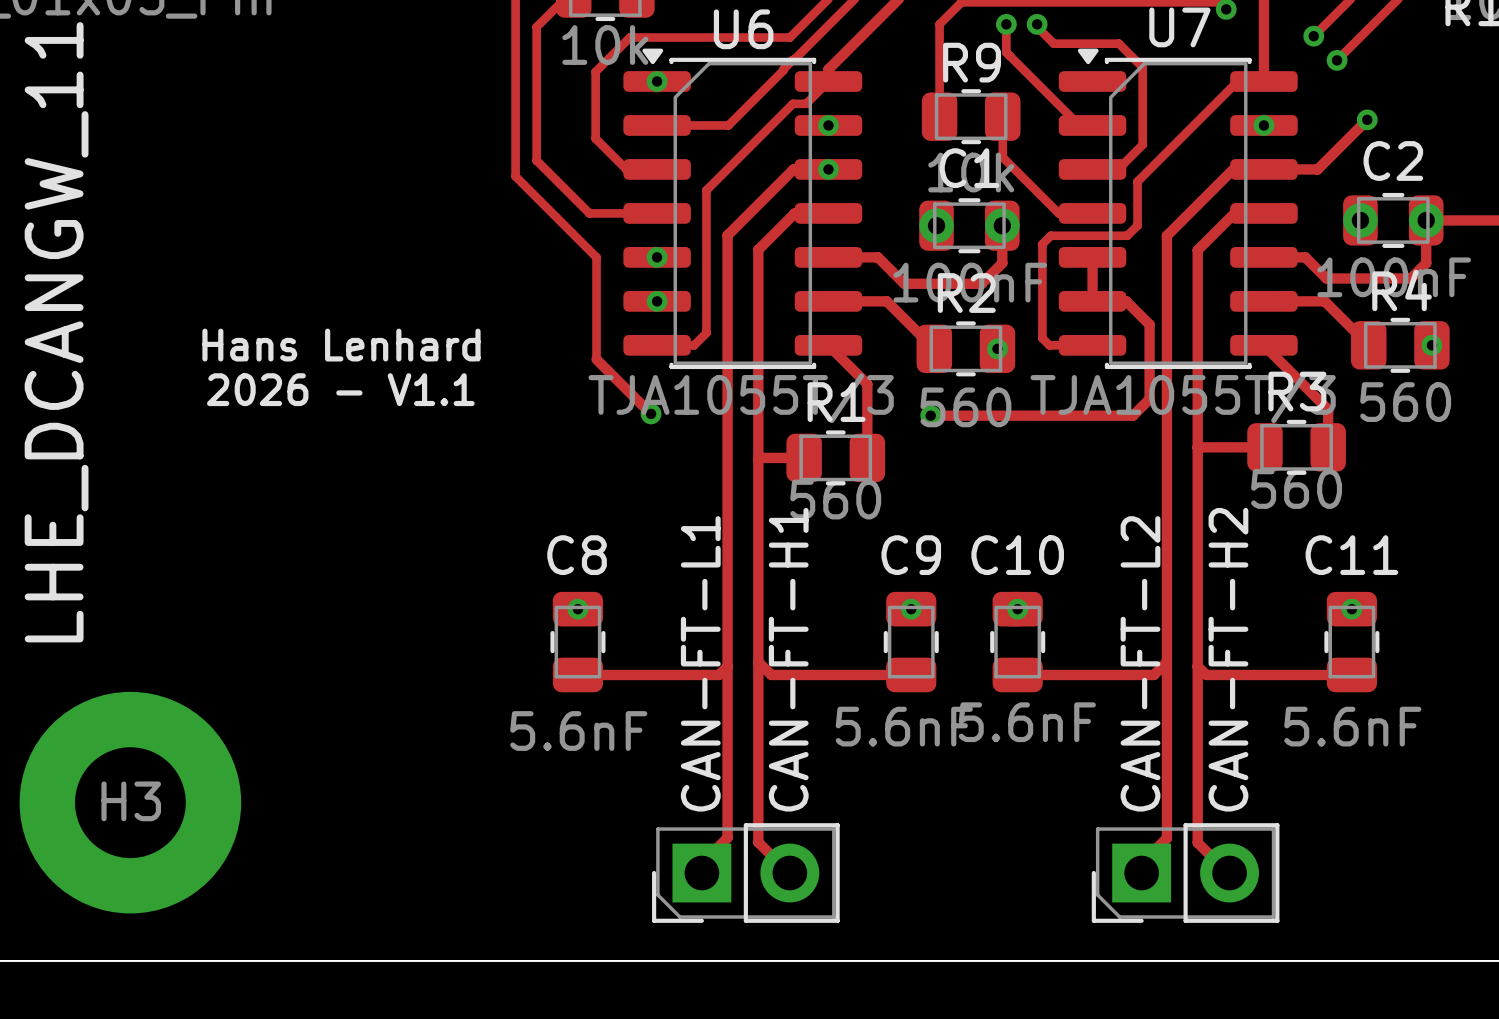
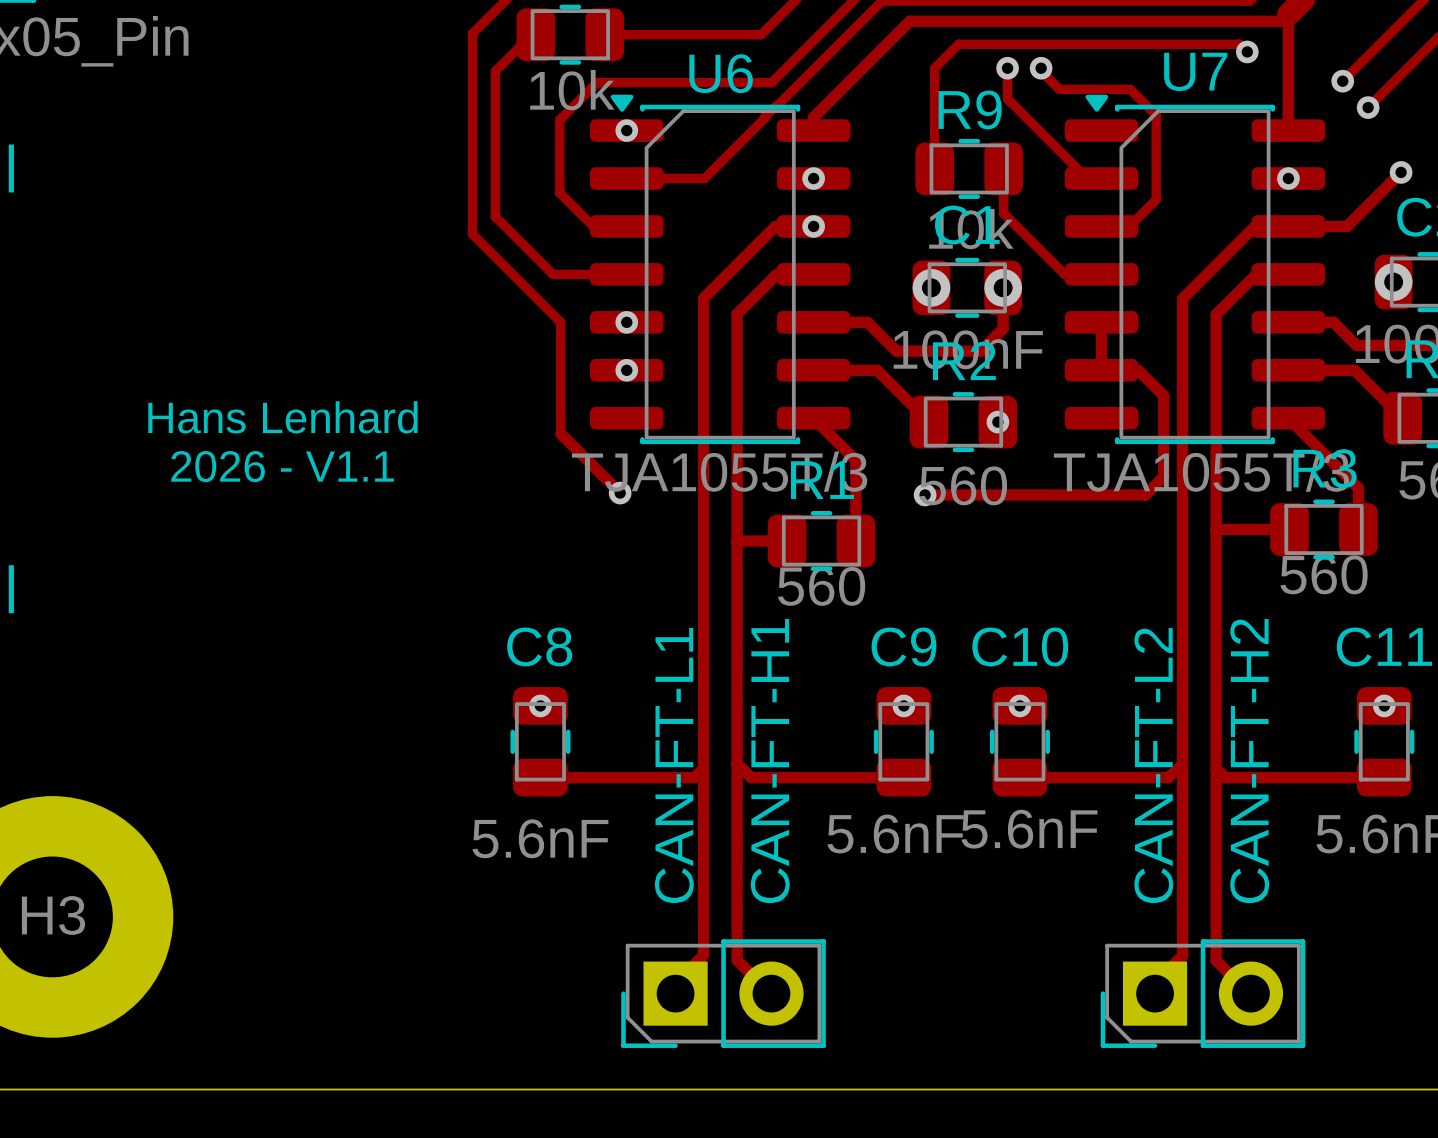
track: (828, 81) (806, 103) (792, 103) (706, 190) (706, 333) (694, 345) (657, 345) -> none
track: (1263, 81) (1237, 81) (1137, 181) (1137, 225) (1127, 235) (1050, 235) (1042, 244) (1042, 338) (1049, 345) (1092, 345) -> none

